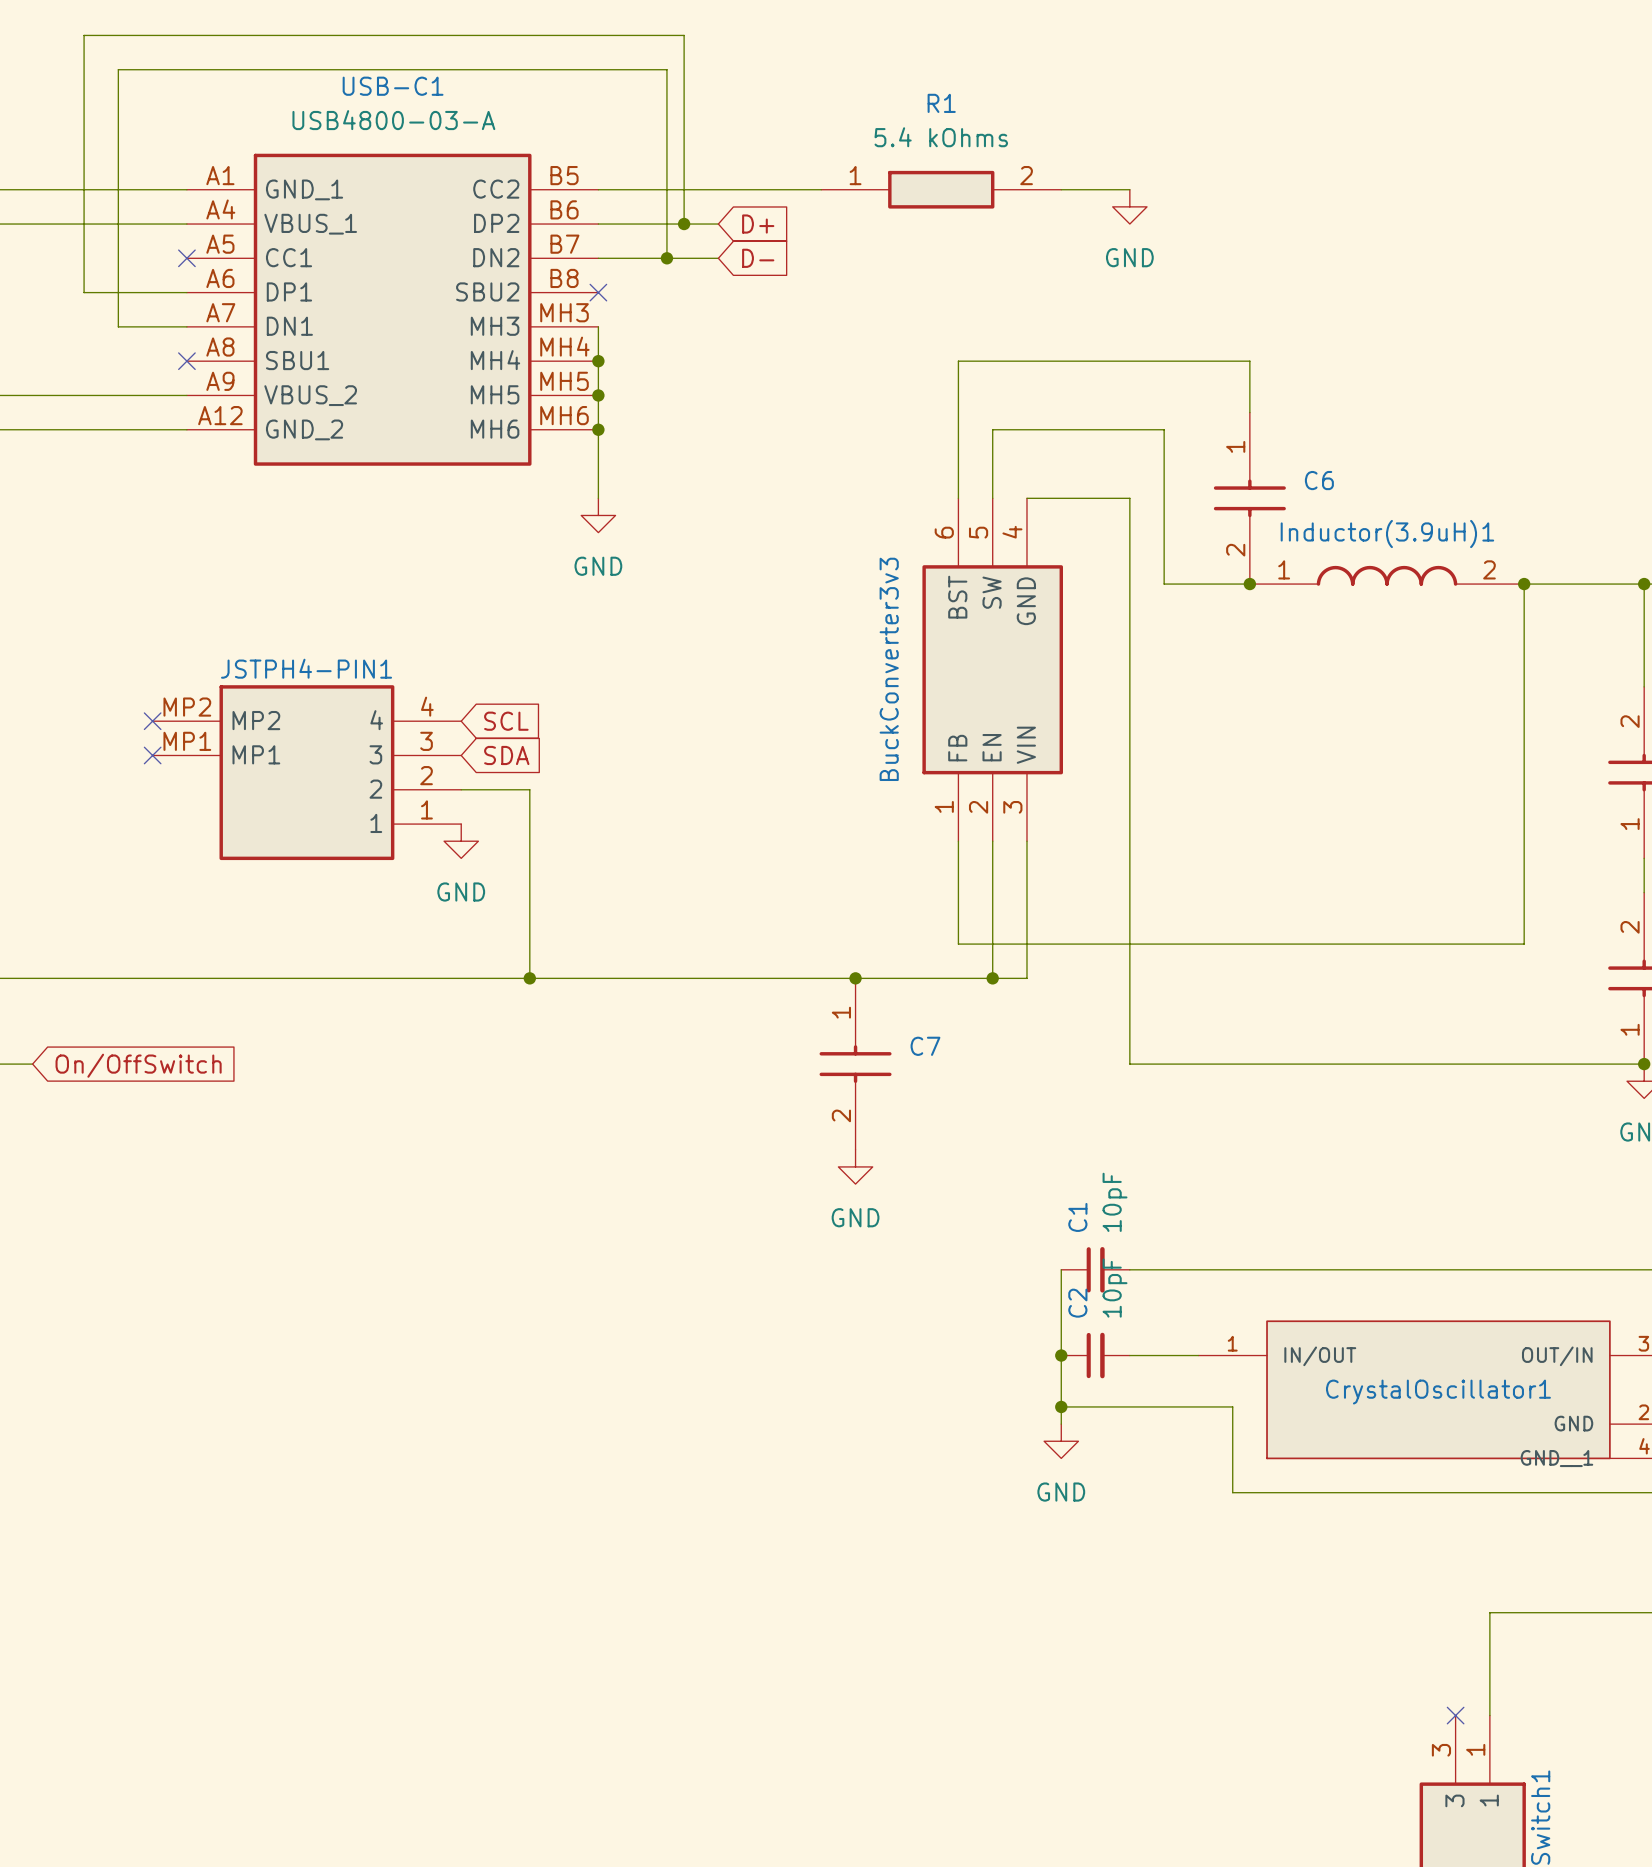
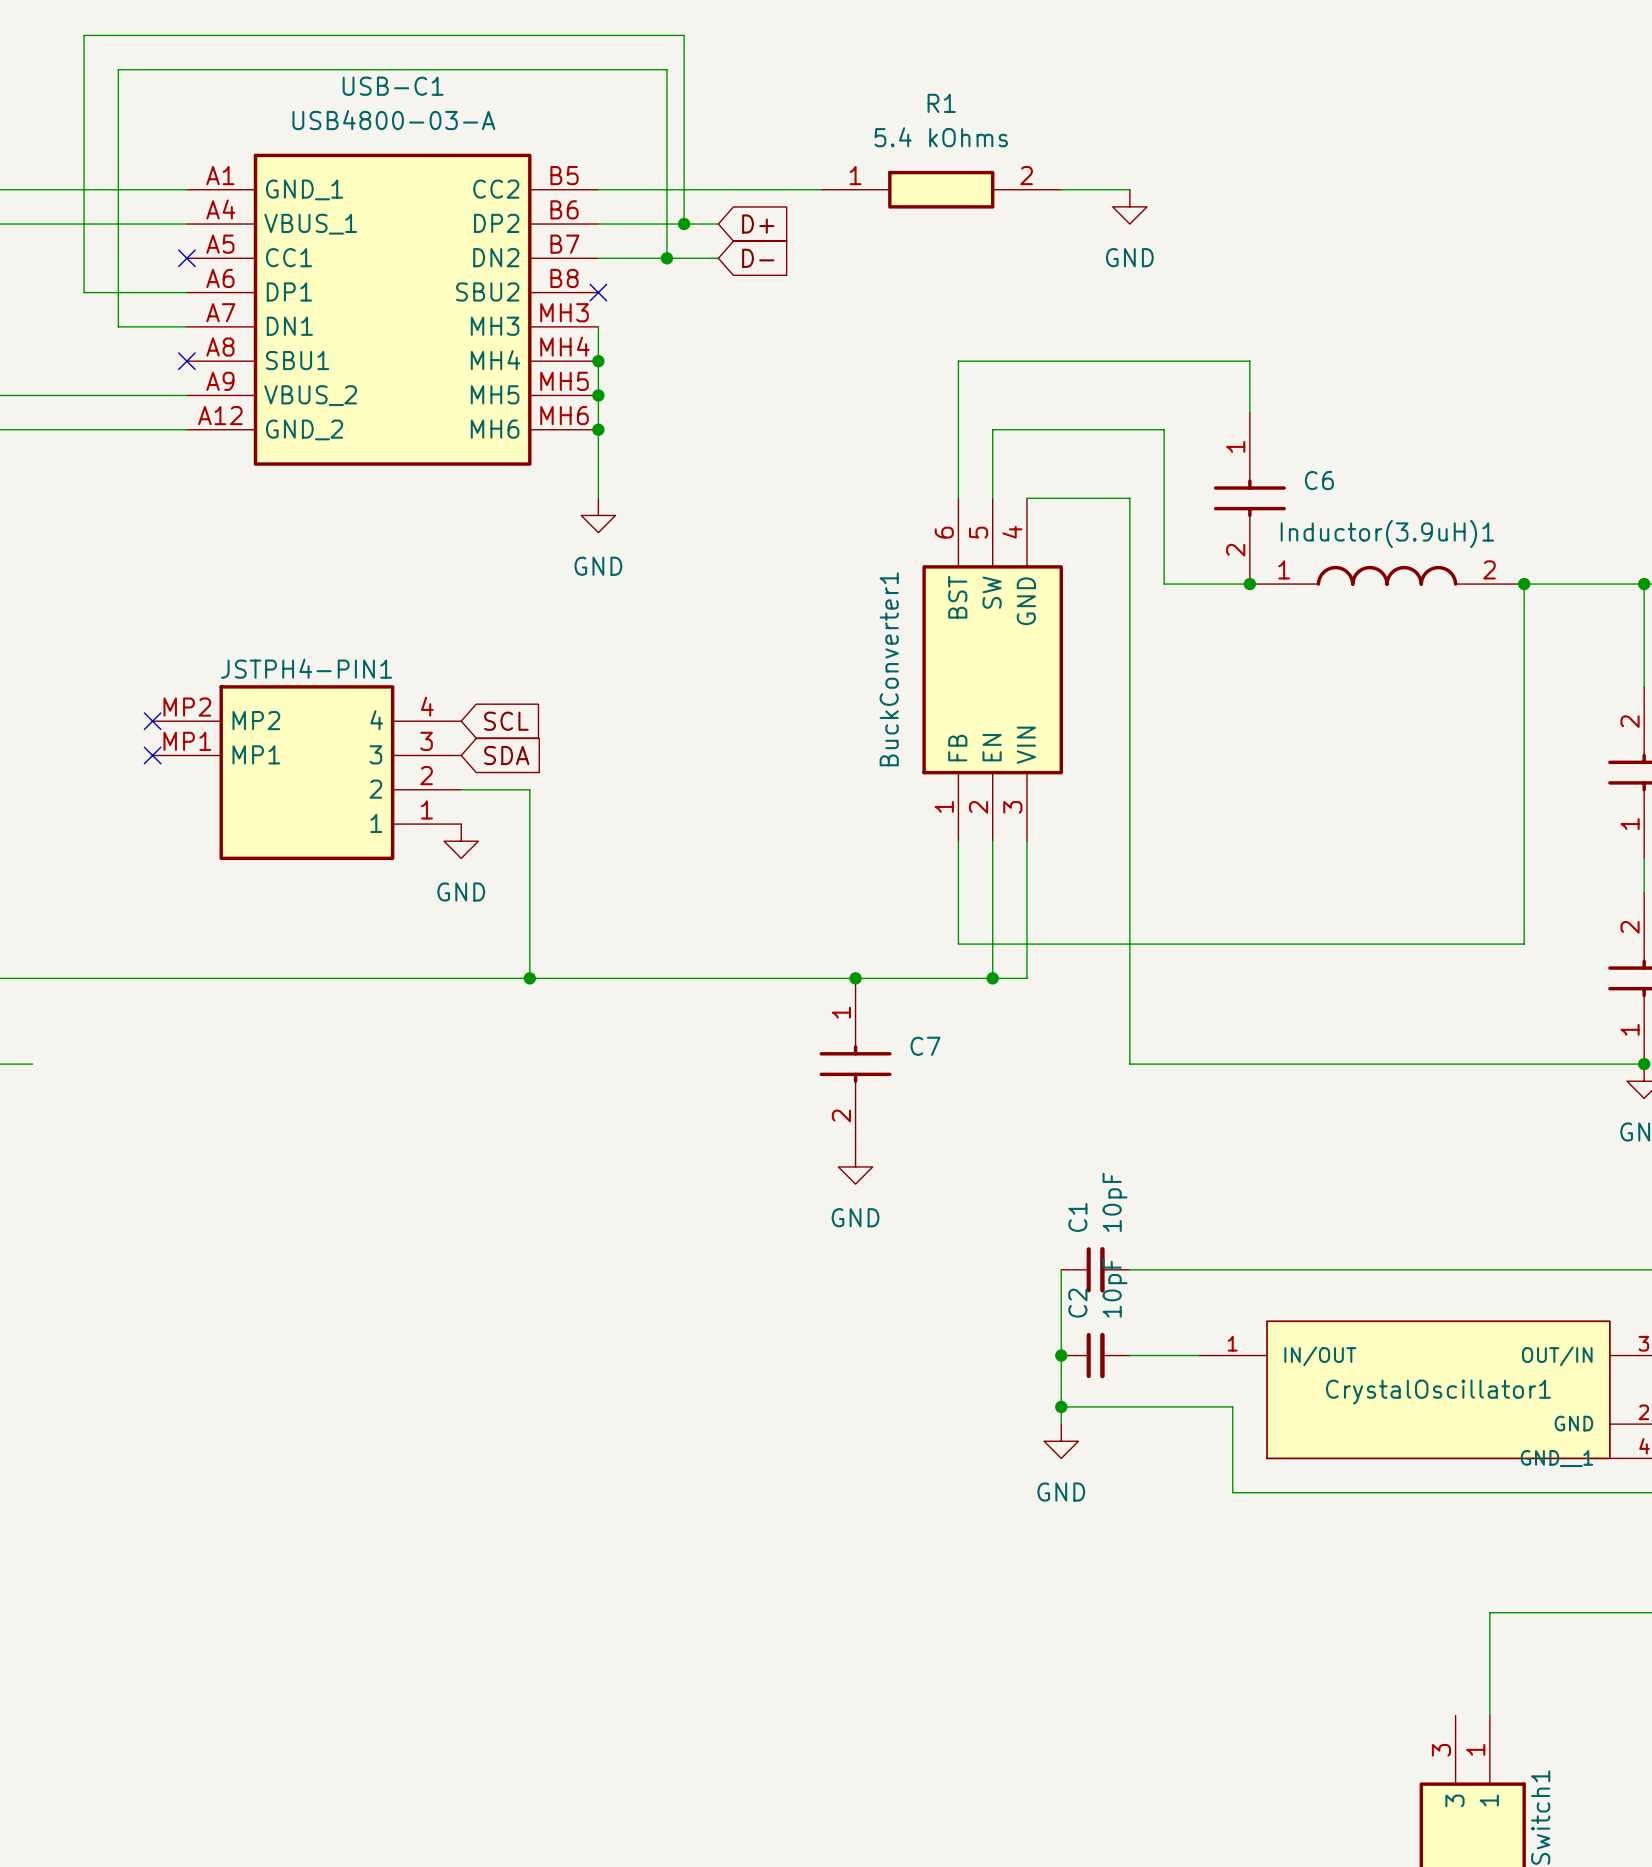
BuckConverter3v3 name: BuckConverter3v3 (889, 669) -> BuckConverter1 (889, 669)
global label: On/OffSwitch (138, 1065) -> none
no-connect mark: (1455, 1715) -> none

